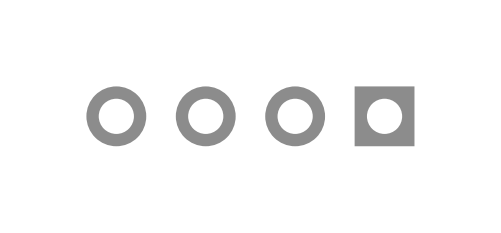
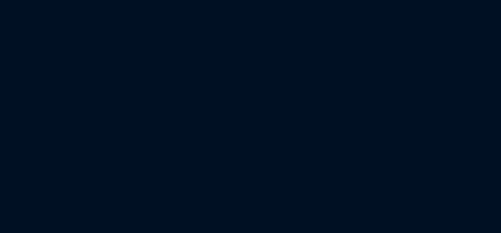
part: (250, 116) -> none

